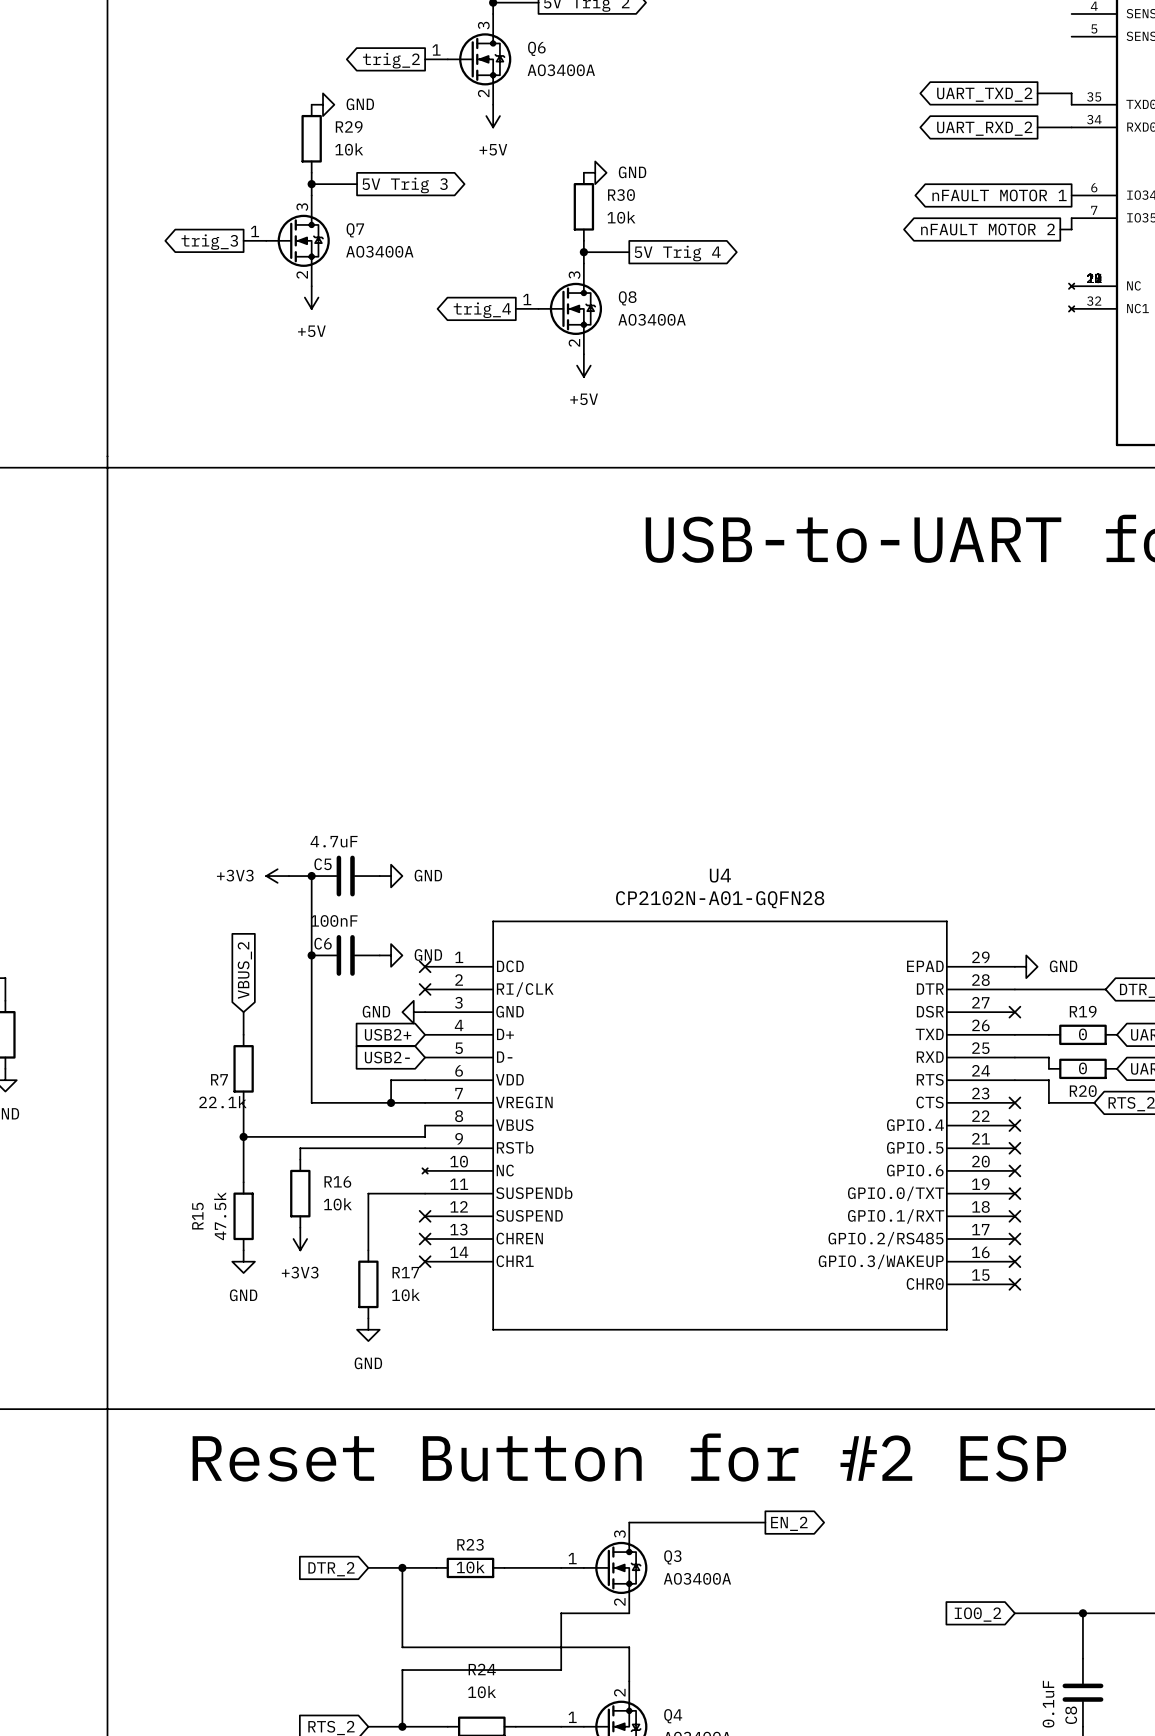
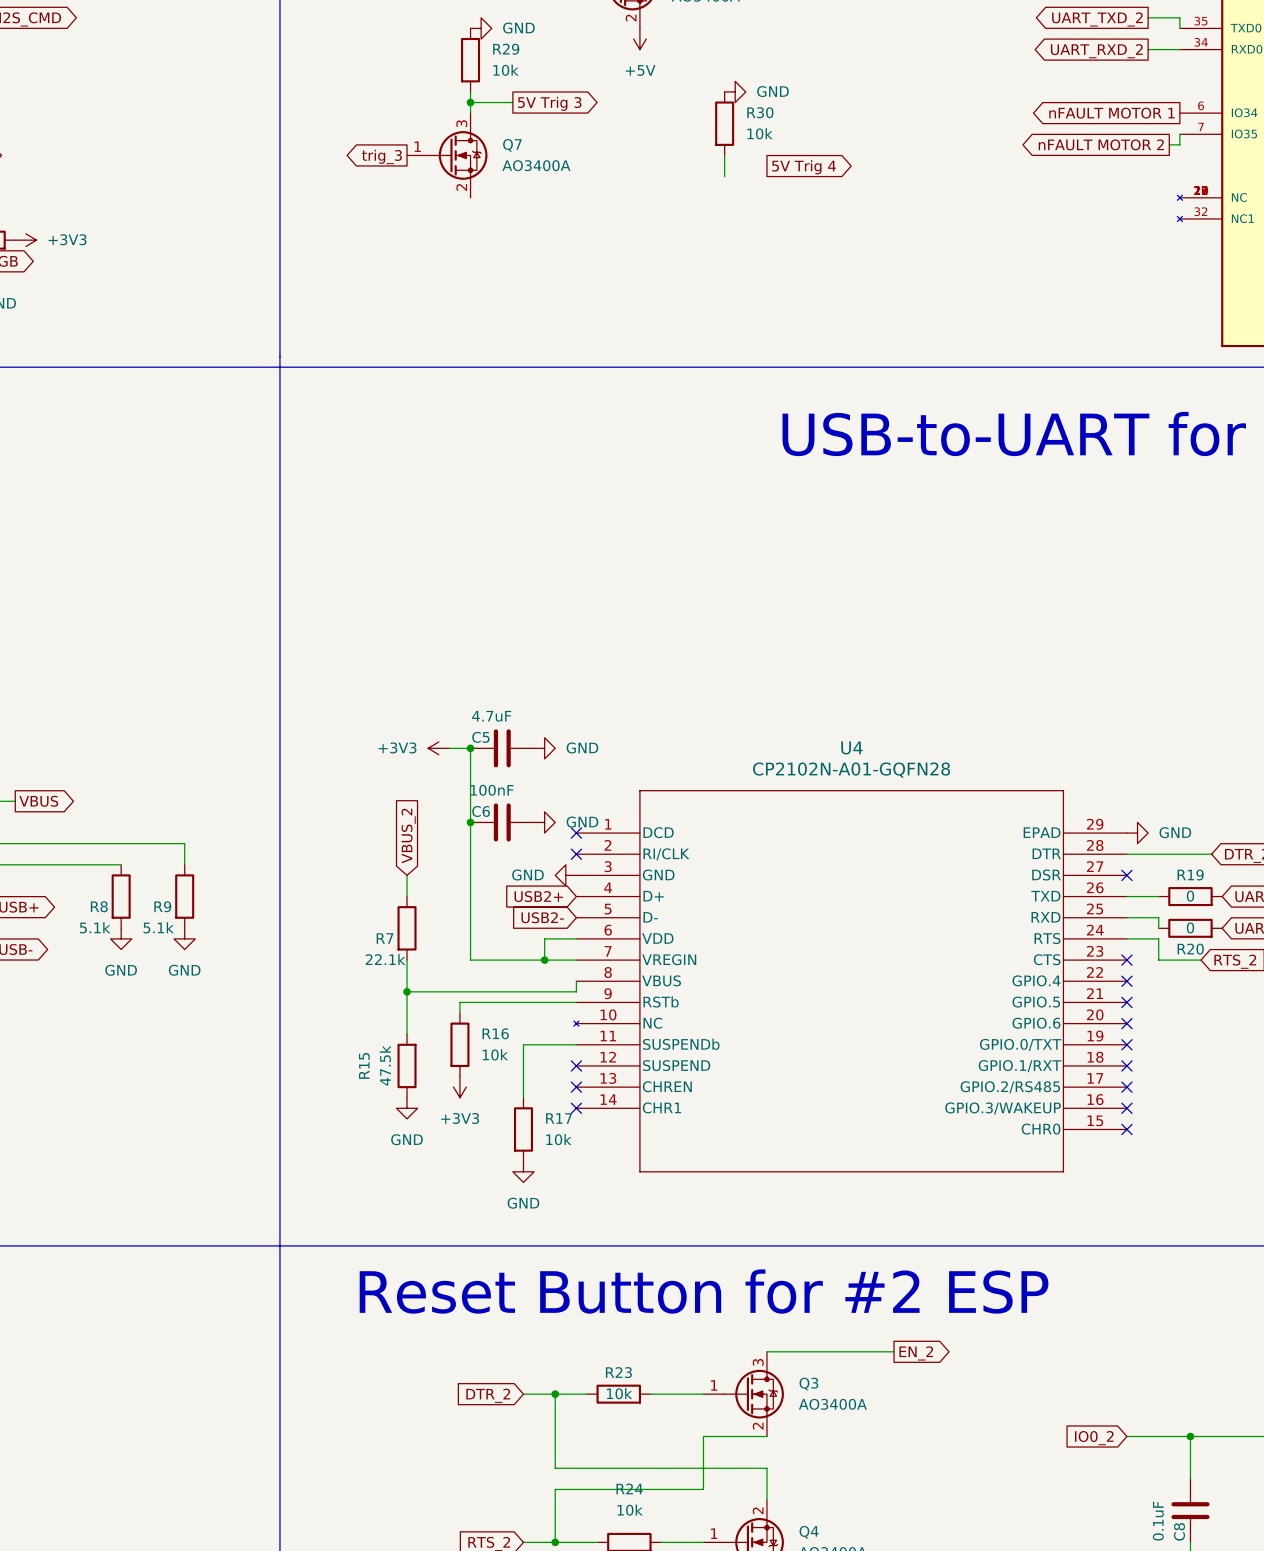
wire: (583, 252) (629, 252) -> none
junction: (583, 252) -> none
power symbol: +5V (311, 297) -> none
Q8: AO3400A (558, 308) -> none
global label: trig_4 (482, 310) -> none
power symbol: +5V (583, 365) -> none

